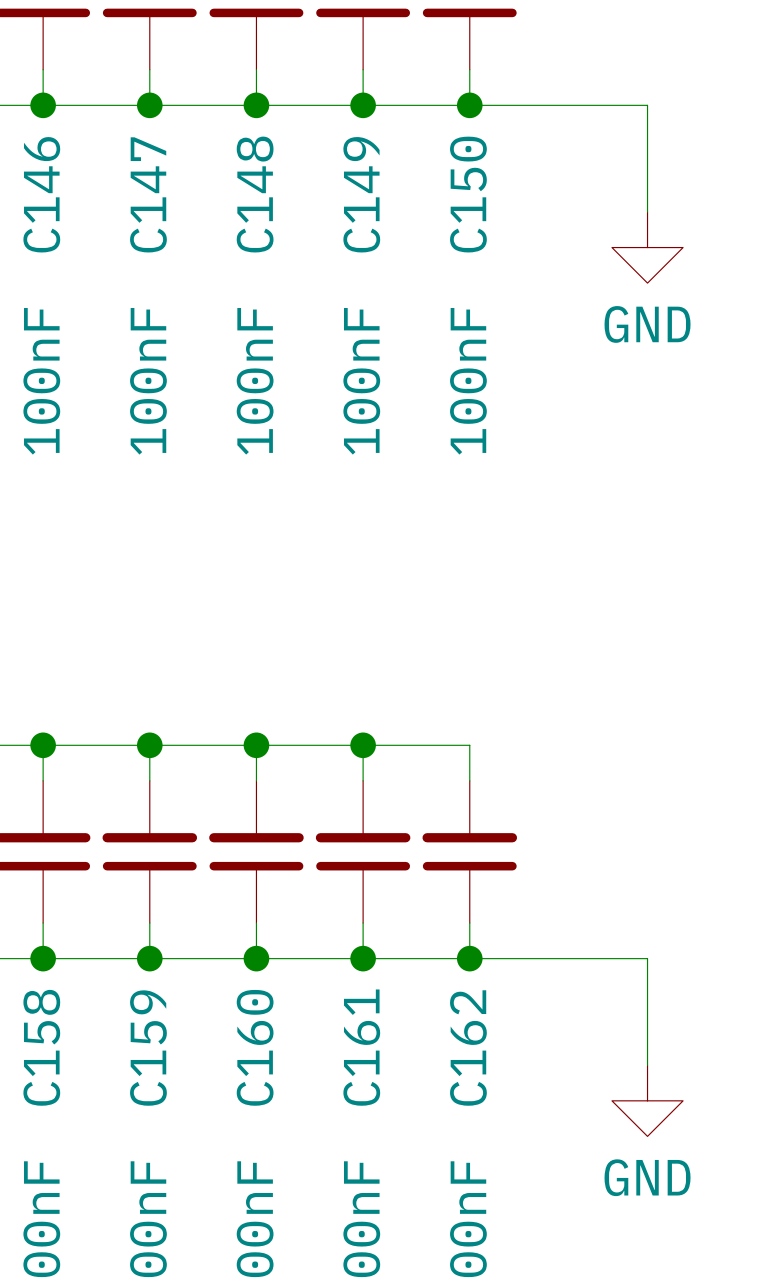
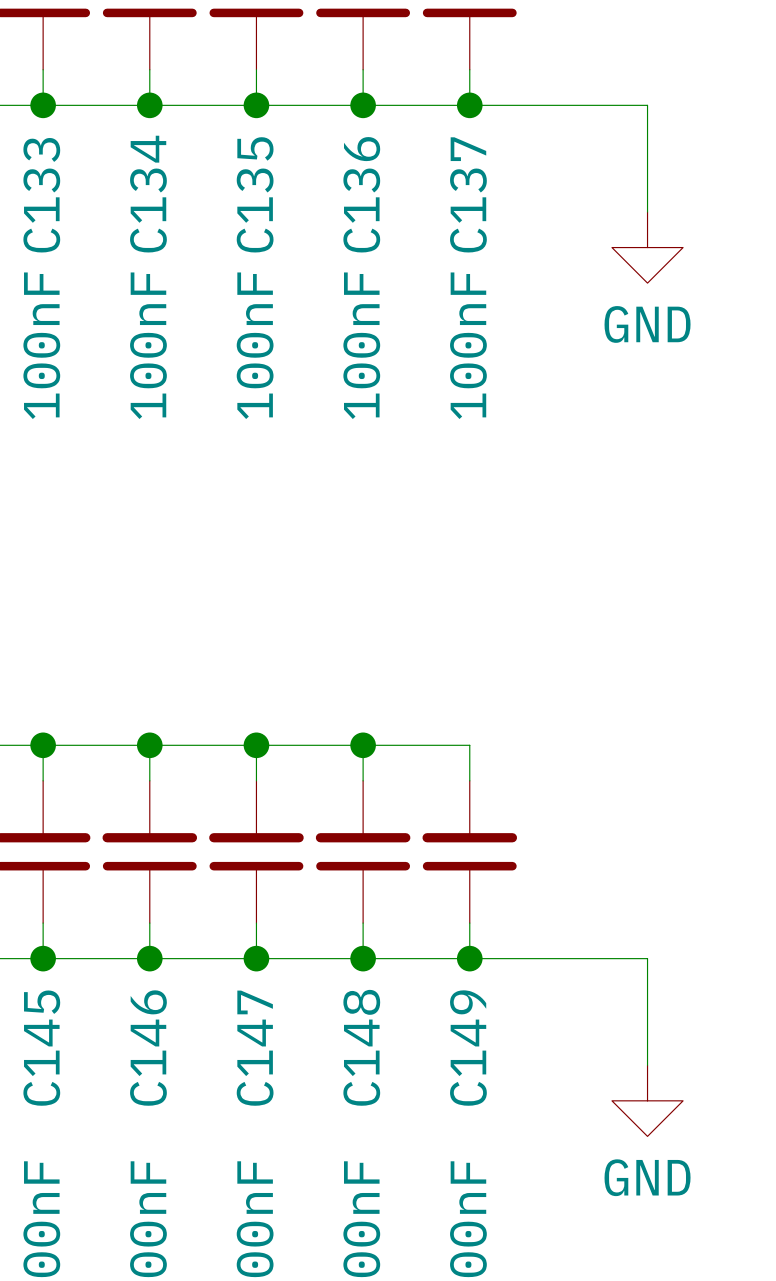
C146 name: C146 (41, 194) -> C133 (41, 195)
C147 name: C147 (148, 194) -> C134 (148, 194)
C148 name: C148 (255, 194) -> C135 (255, 194)
C149 name: C149 (361, 194) -> C136 (361, 194)
C150 name: C150 (468, 194) -> C137 (468, 194)
C146 value position: 100nF (41, 381) -> 100nF (41, 345)
C147 value position: 100nF (148, 381) -> 100nF (148, 345)
C148 value position: 100nF (255, 381) -> 100nF (255, 345)
C149 value position: 100nF (361, 381) -> 100nF (361, 345)
C150 value position: 100nF (468, 381) -> 100nF (468, 345)
C158 name: C158 (41, 1047) -> C145 (41, 1048)
C160 name: C160 (255, 1047) -> C147 (255, 1048)
C161 name: C161 (361, 1047) -> C148 (361, 1047)
C159 name: C159 (148, 1048) -> C146 (148, 1048)
C162 name: C162 (468, 1048) -> C149 (468, 1048)

